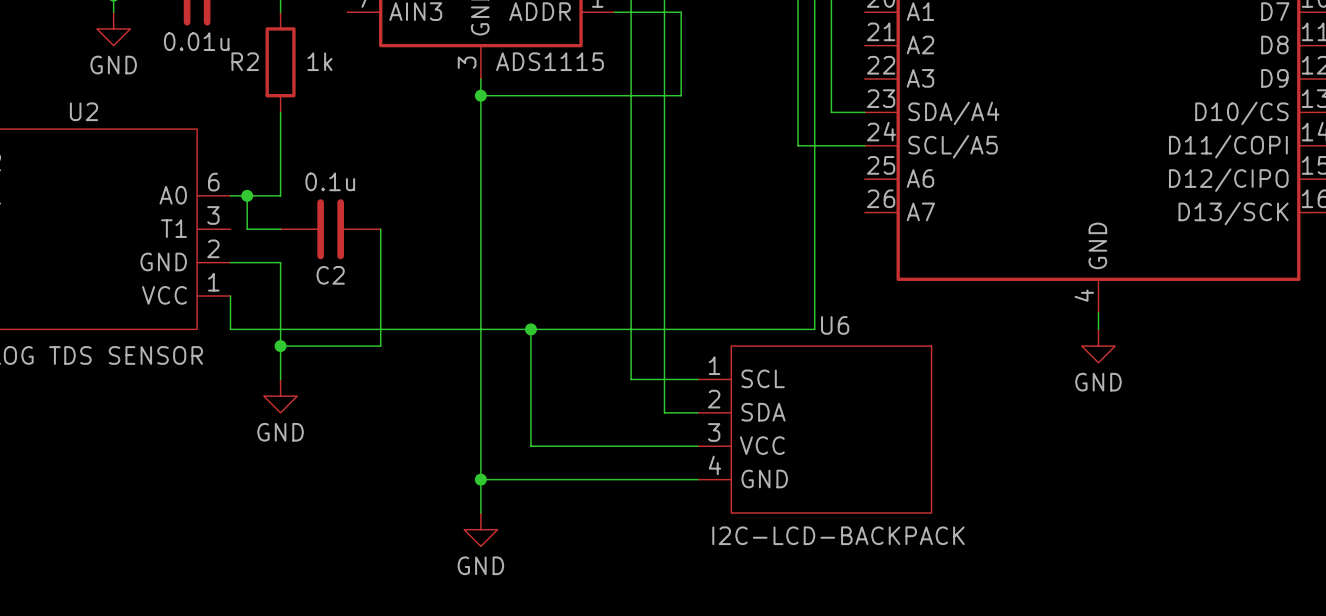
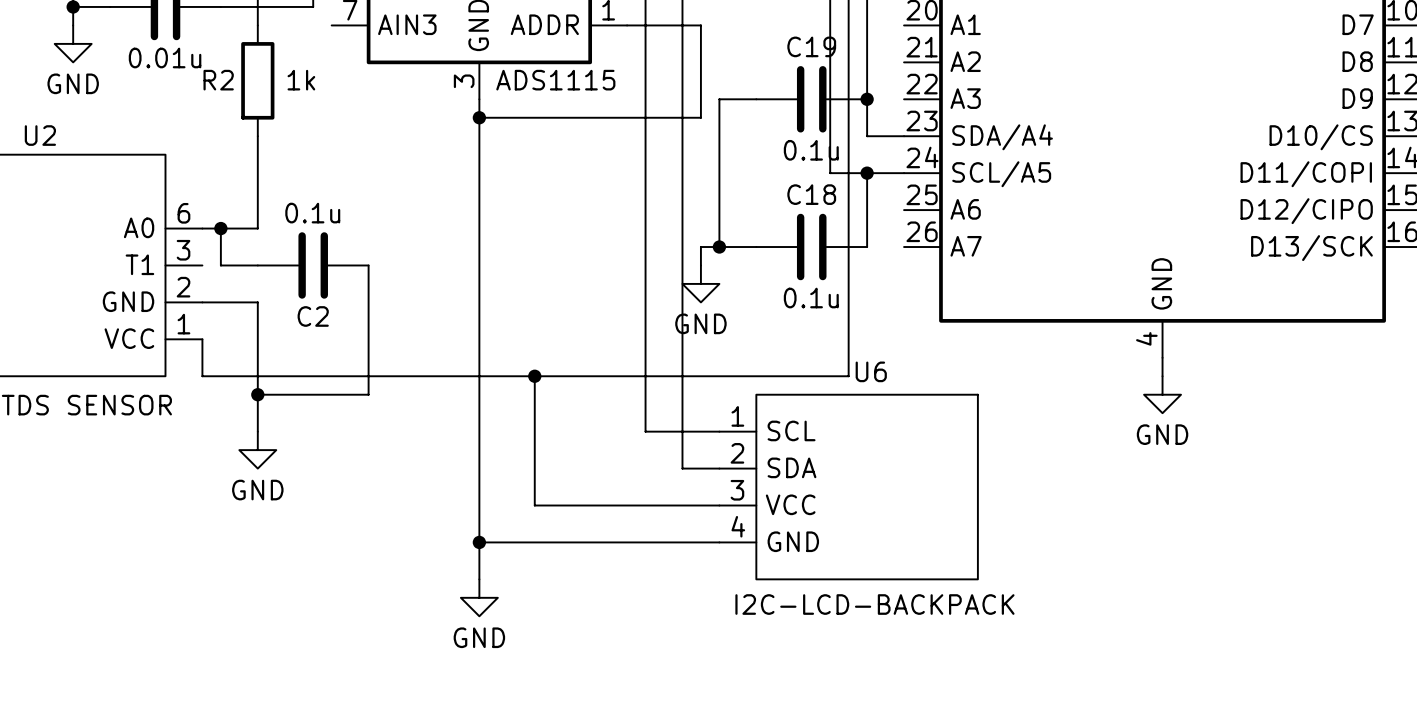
wire: none -> (756, 99) (719, 99) (719, 247)
C19: none -> 0.1u (811, 99)
junction: none -> (867, 99)
wire: none -> (867, 173) (867, 247)
junction: none -> (867, 173)
junction: none -> (719, 247)
wire: none -> (756, 247) (700, 247) (700, 265)
C18: none -> 0.1u (811, 247)
power symbol: none -> GND (700, 283)

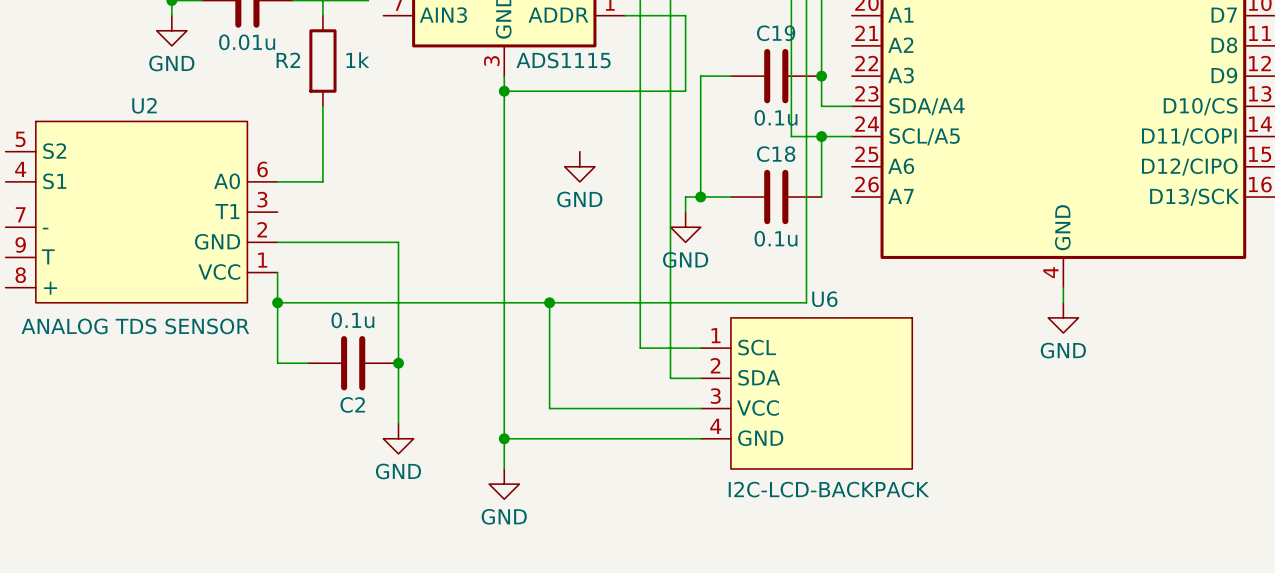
power symbol: none -> GND (579, 166)
wire: (220, 228) (220, 265) (257, 265) -> none
junction: (220, 228) -> none
C2 position: (313, 265) -> (353, 363)
wire: (368, 265) (368, 394) (257, 394) -> none
wire: (257, 302) (257, 431) -> (322, 242) (398, 242) (398, 423)
wire: none -> (277, 302) (277, 363) (307, 363)
junction: none -> (277, 302)
junction: (257, 394) -> none
power symbol position: GND (257, 450) -> GND (398, 438)
junction: none -> (398, 363)

